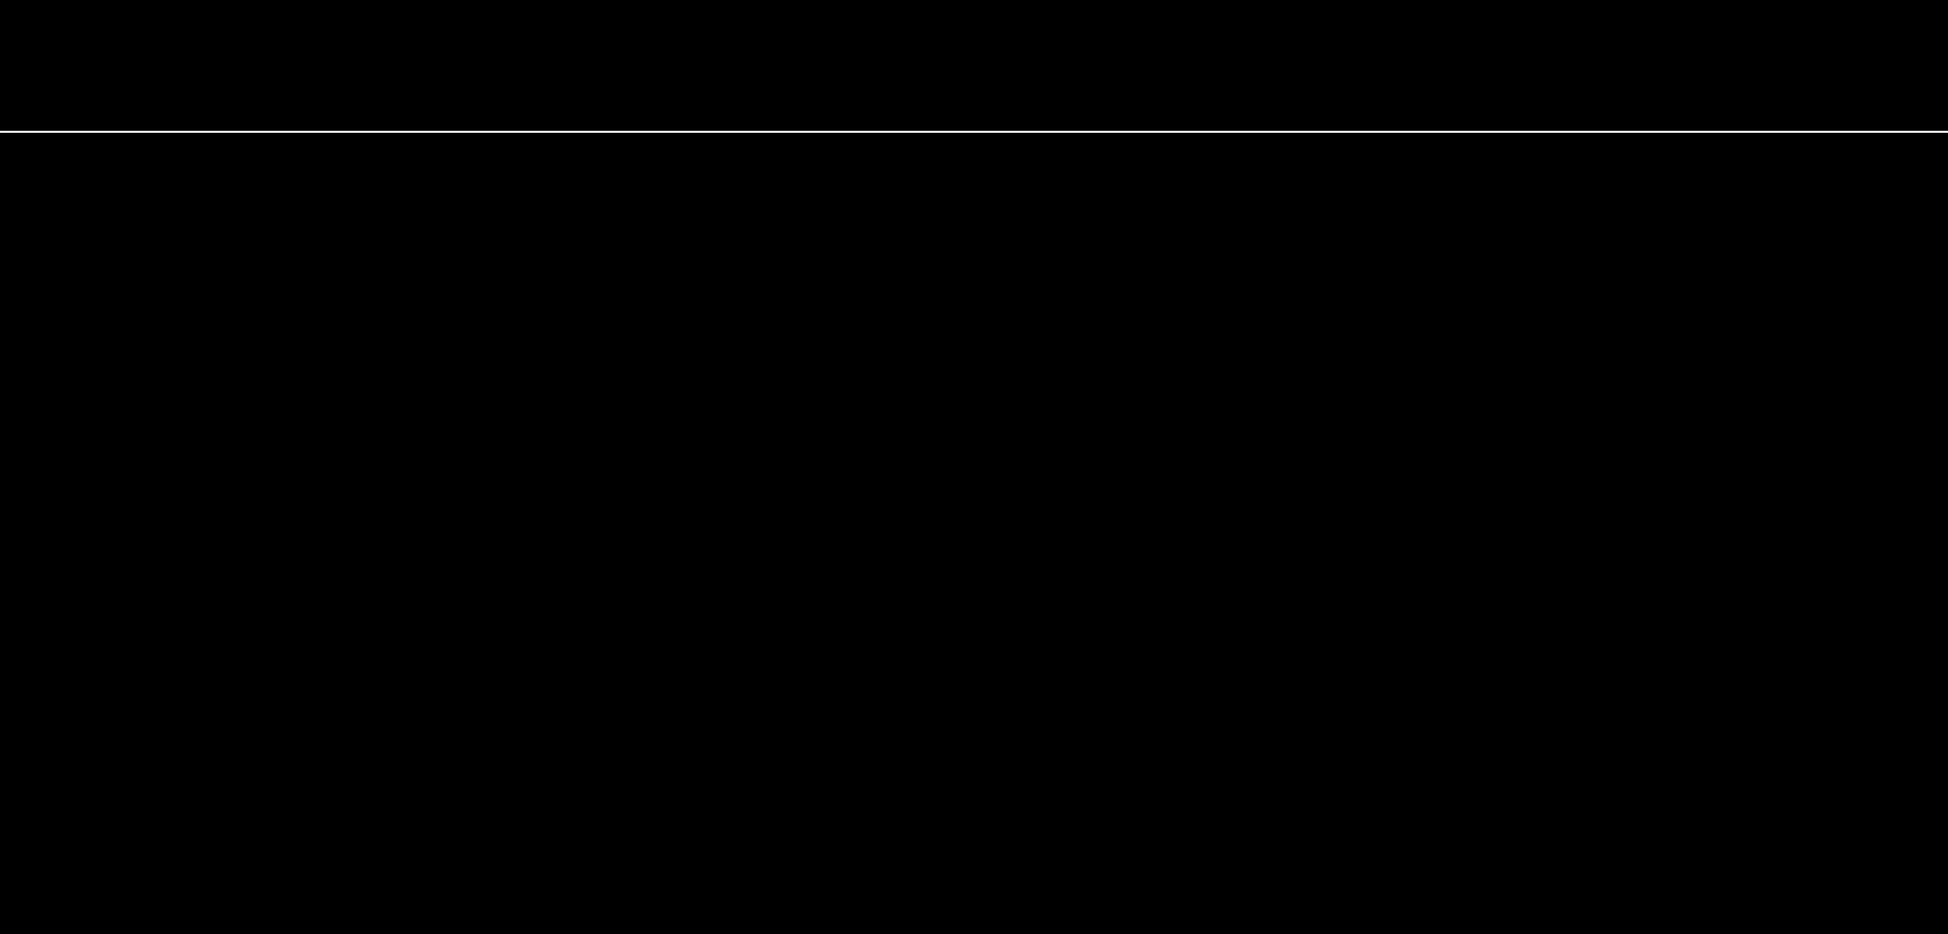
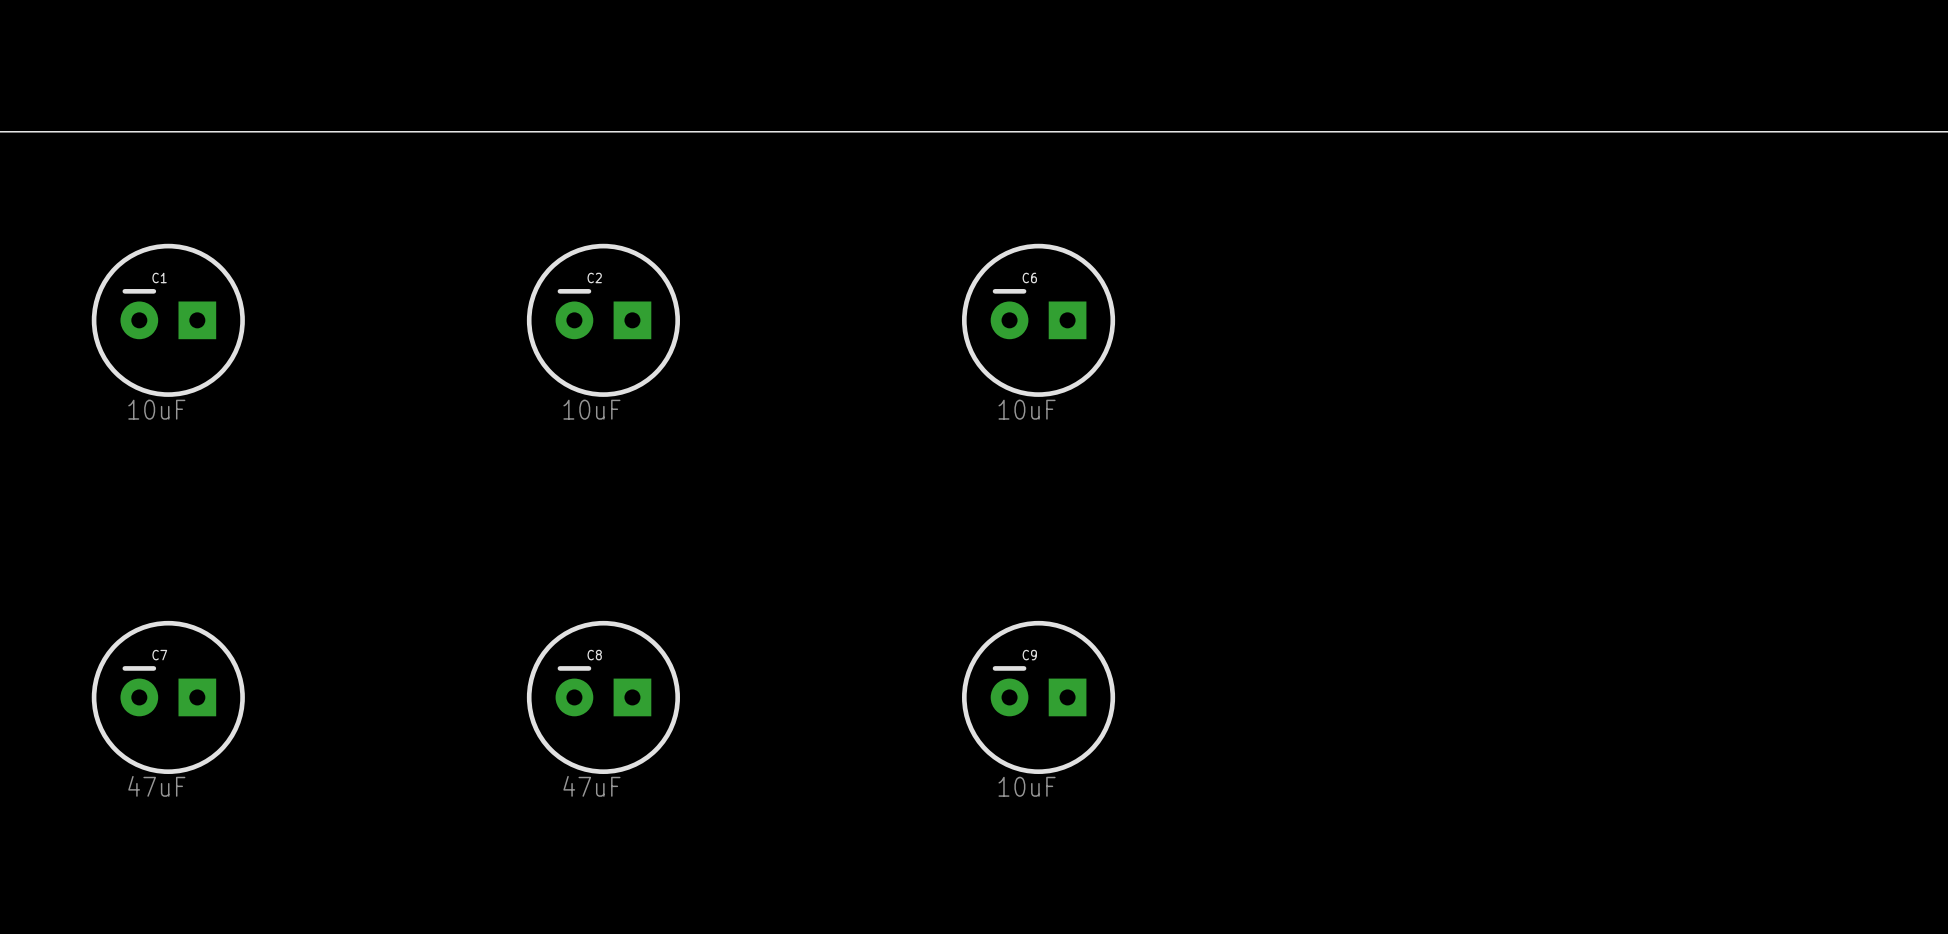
C1: none -> 10uF (168, 320)
C2: none -> 10uF (603, 320)
C6: none -> 10uF (1038, 320)
C7: none -> 47uF (168, 697)
C8: none -> 47uF (603, 697)
C9: none -> 10uF (1038, 697)

